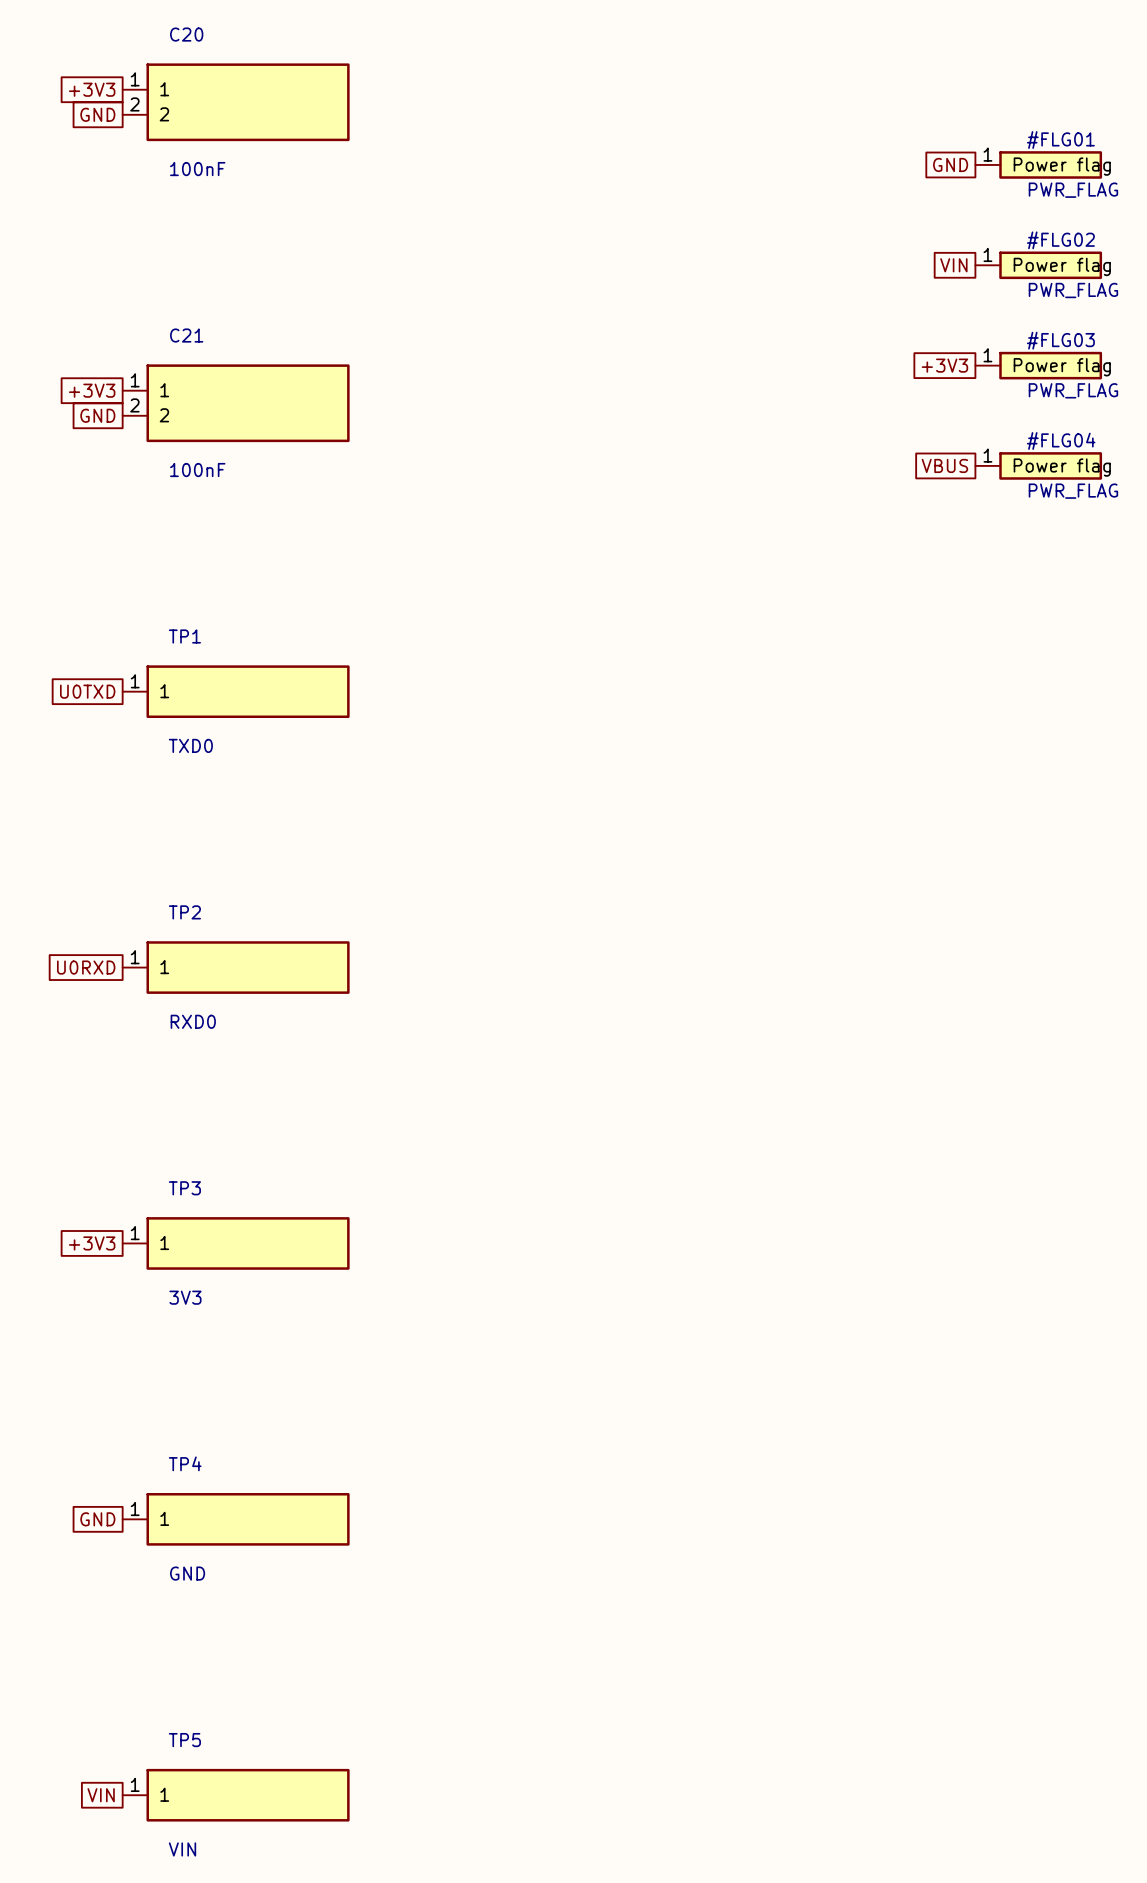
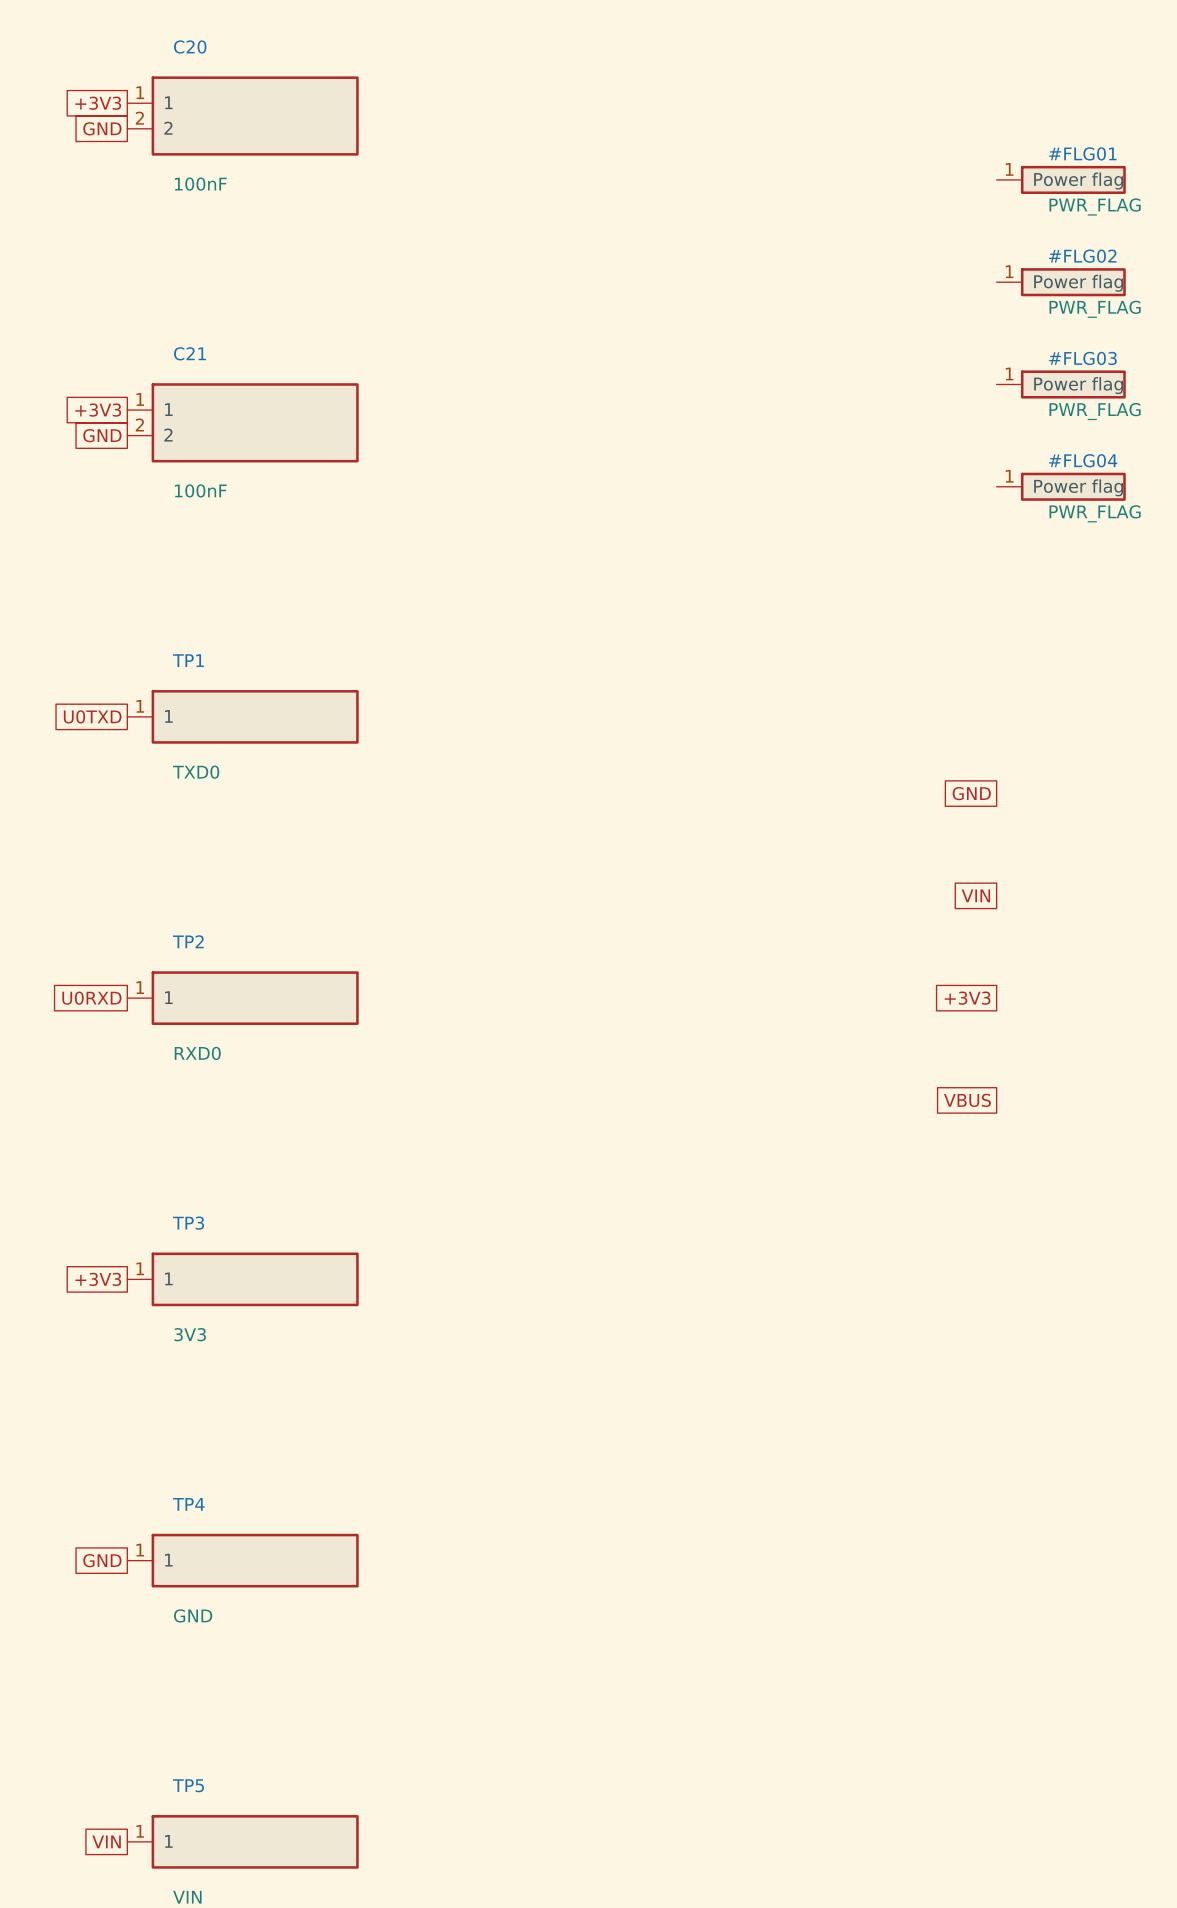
global label: GND (950, 164) -> none
global label: VIN (953, 265) -> none
global label: +3V3 (944, 365) -> none
global label: VBUS (944, 465) -> none
global label: none -> GND (971, 793)
global label: none -> VIN (975, 895)
global label: none -> +3V3 (967, 998)
global label: none -> VBUS (967, 1100)

